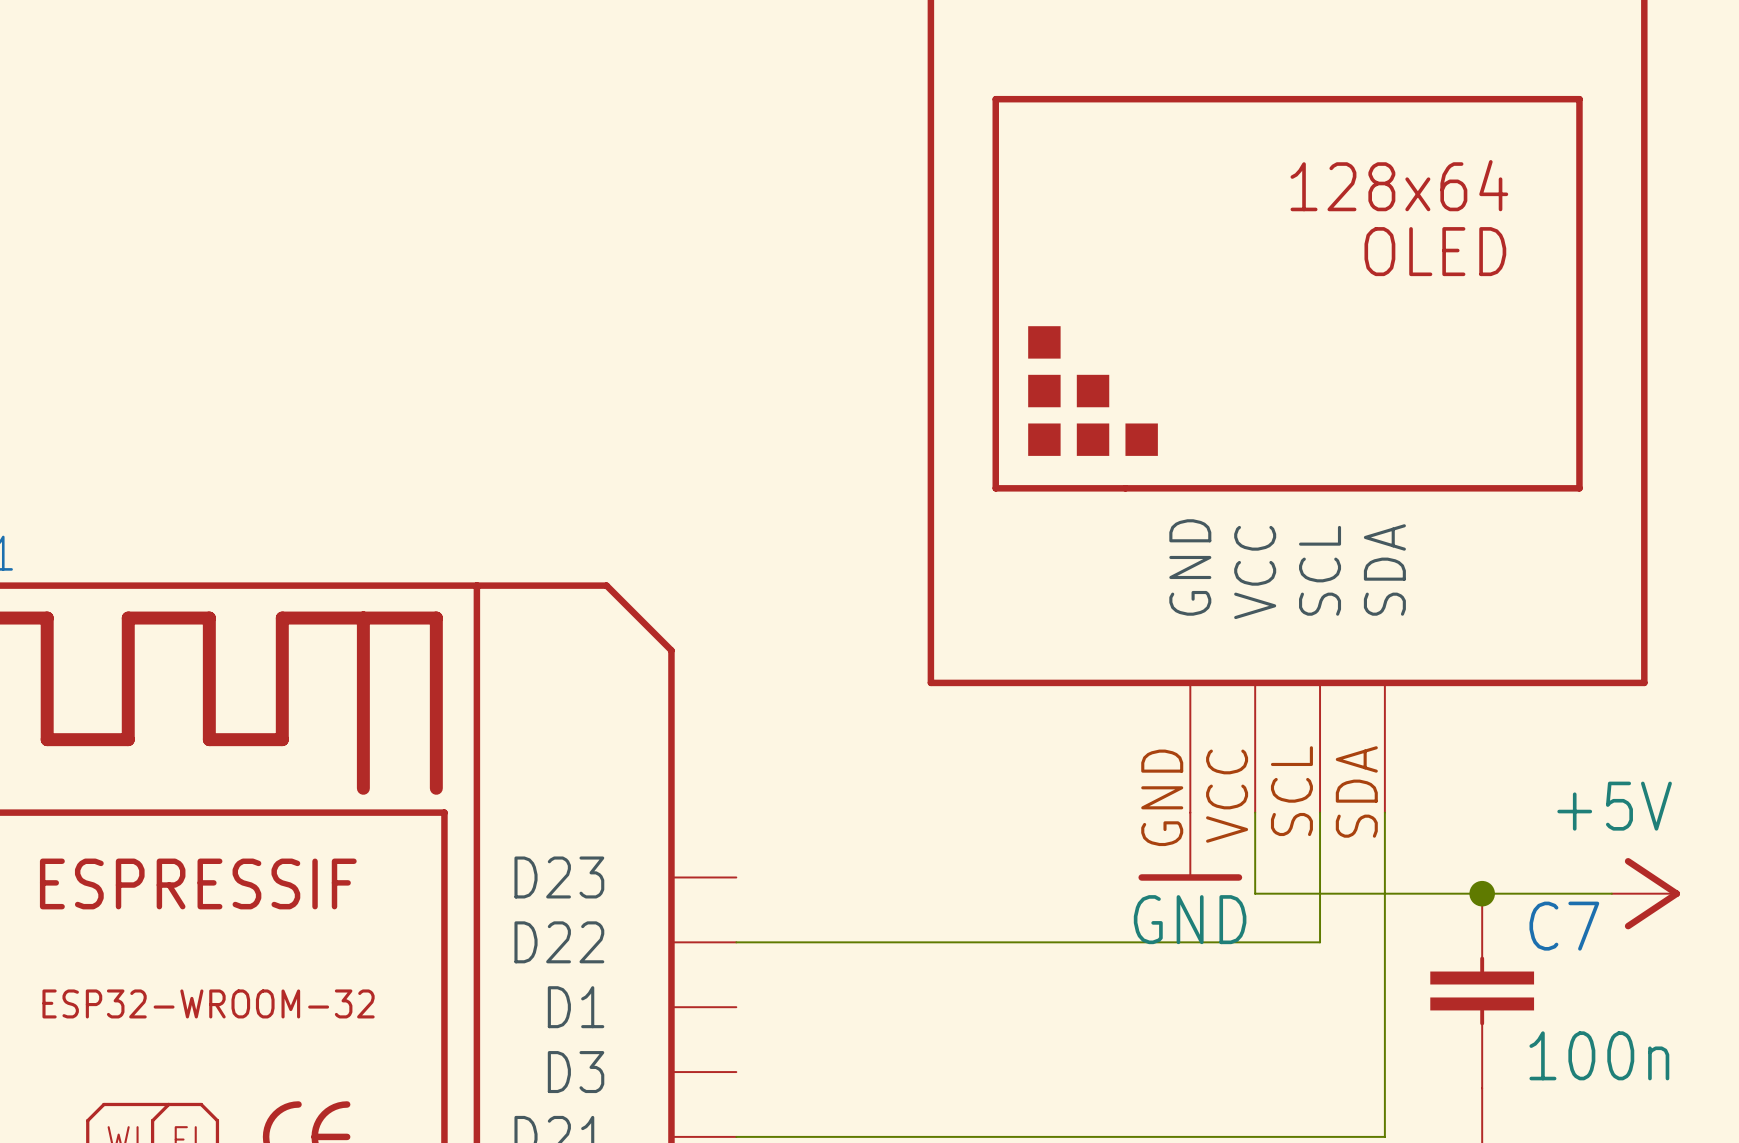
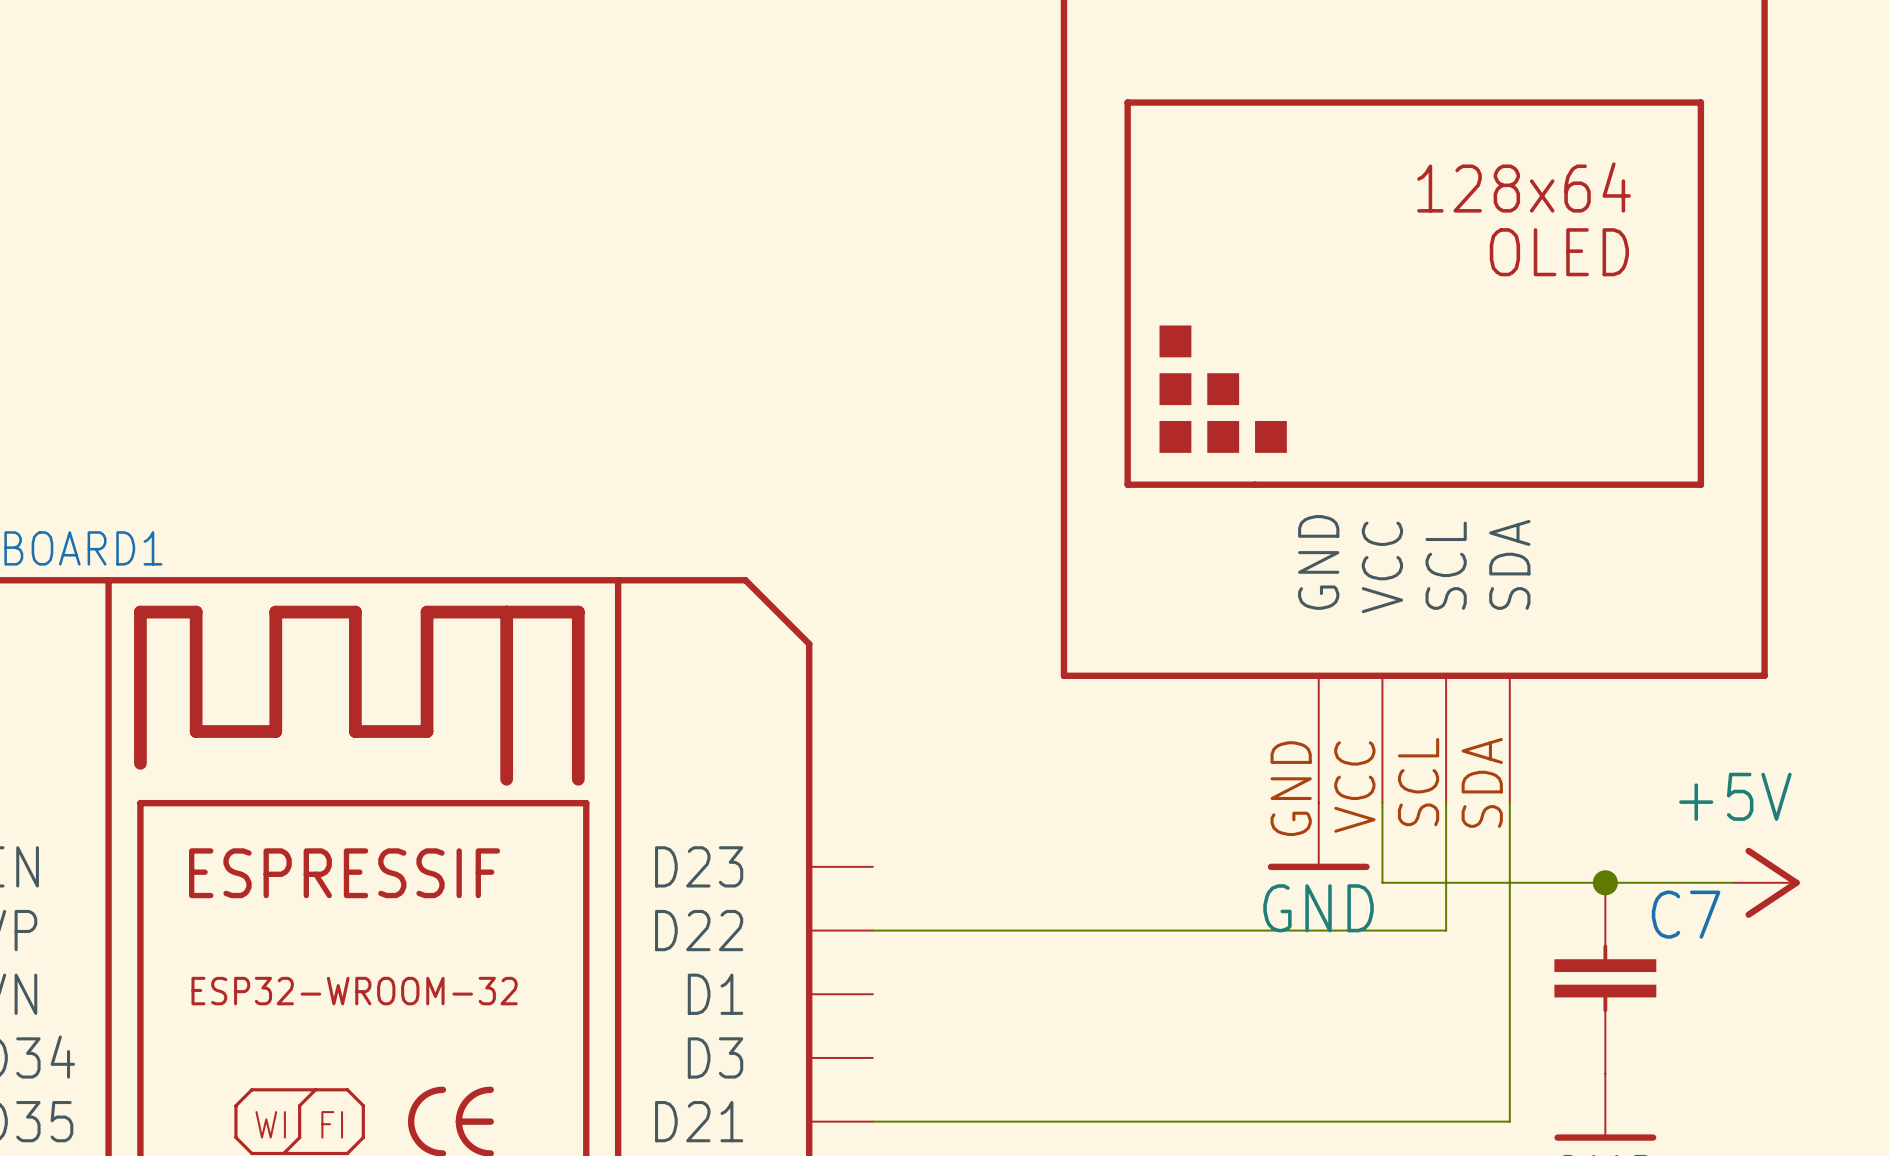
C7 value: 100n (1599, 1055) -> none

